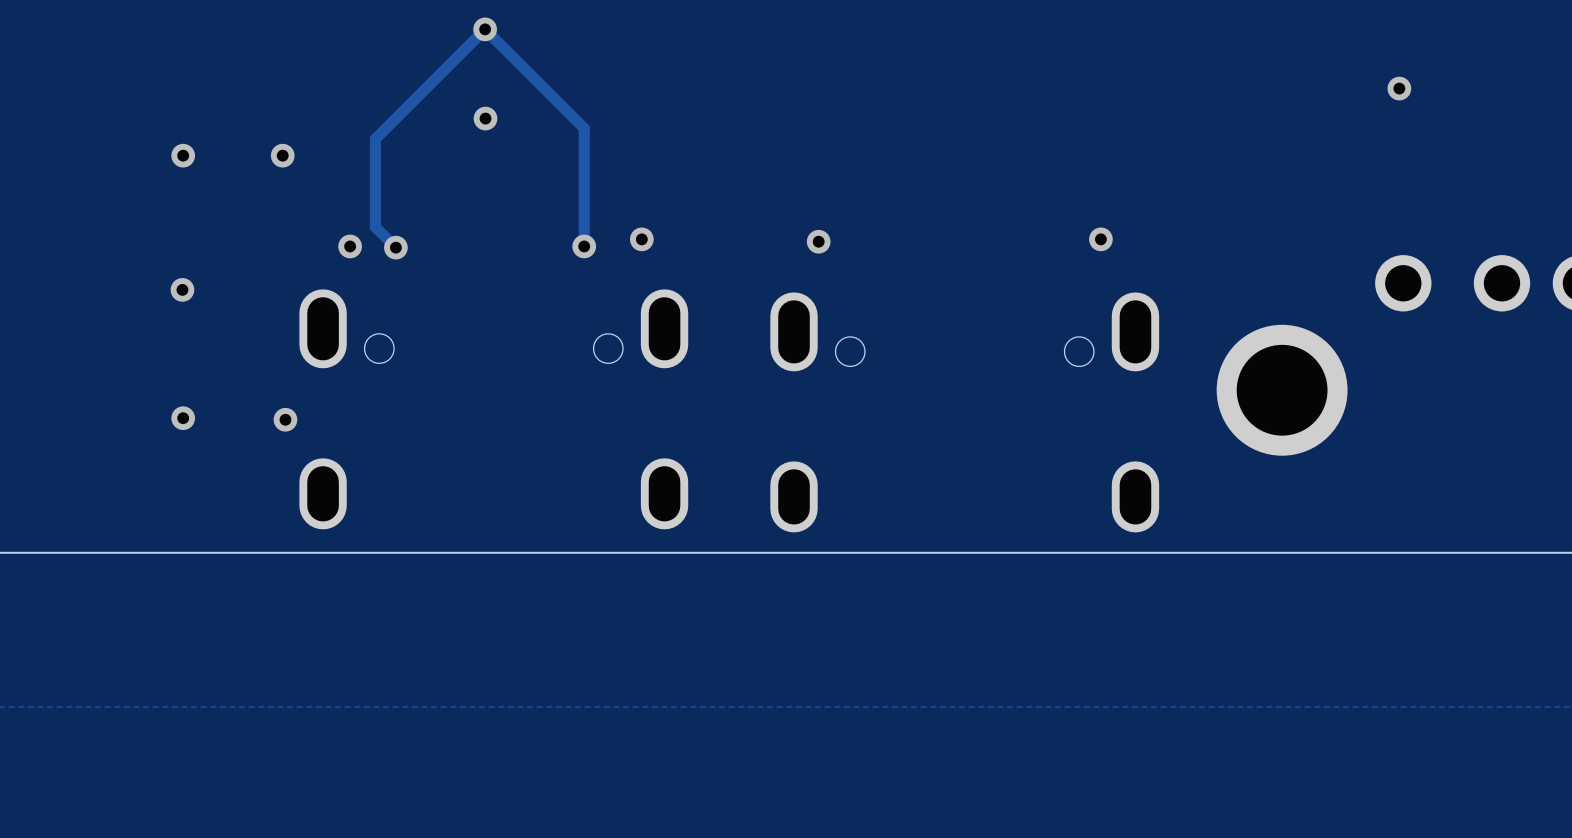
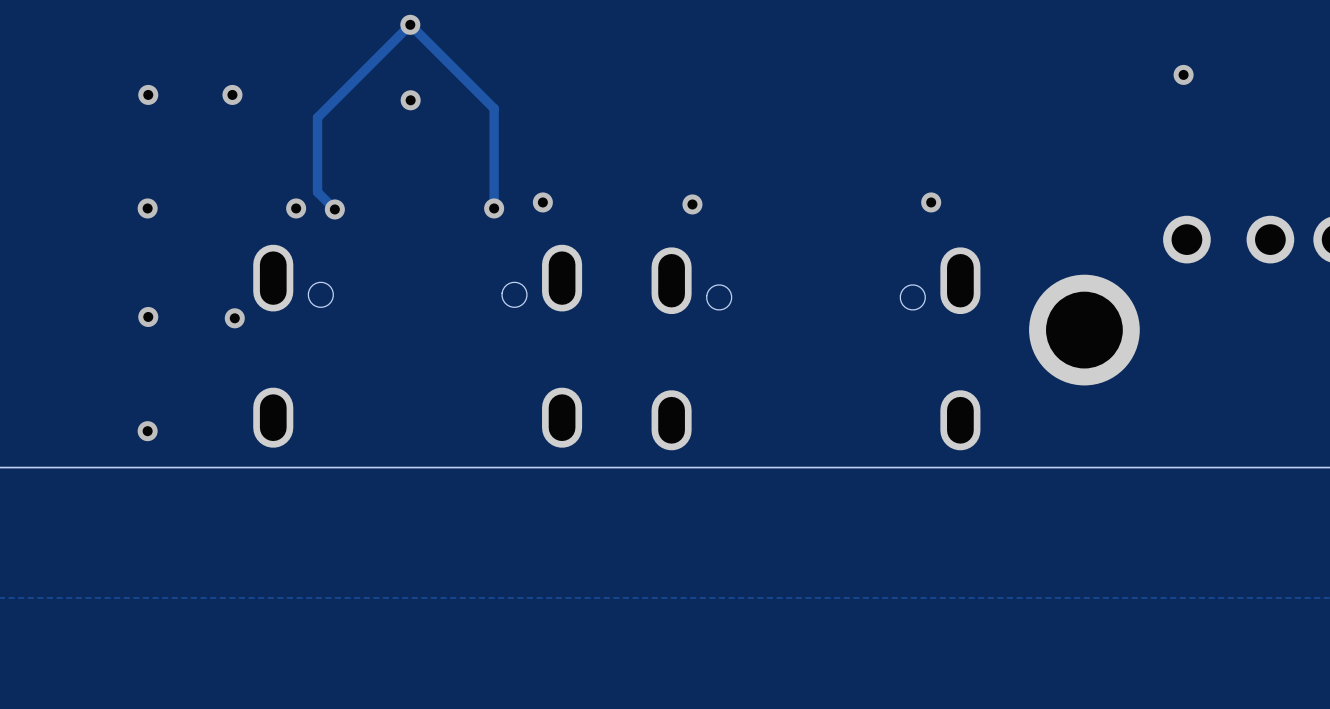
via position: (183, 155) -> (148, 94)
via position: (282, 155) -> (232, 94)
via: none -> (147, 208)
via: (182, 289) -> none
via: none -> (148, 316)
via: (183, 418) -> none
via position: (285, 419) -> (234, 318)
via: none -> (147, 431)

